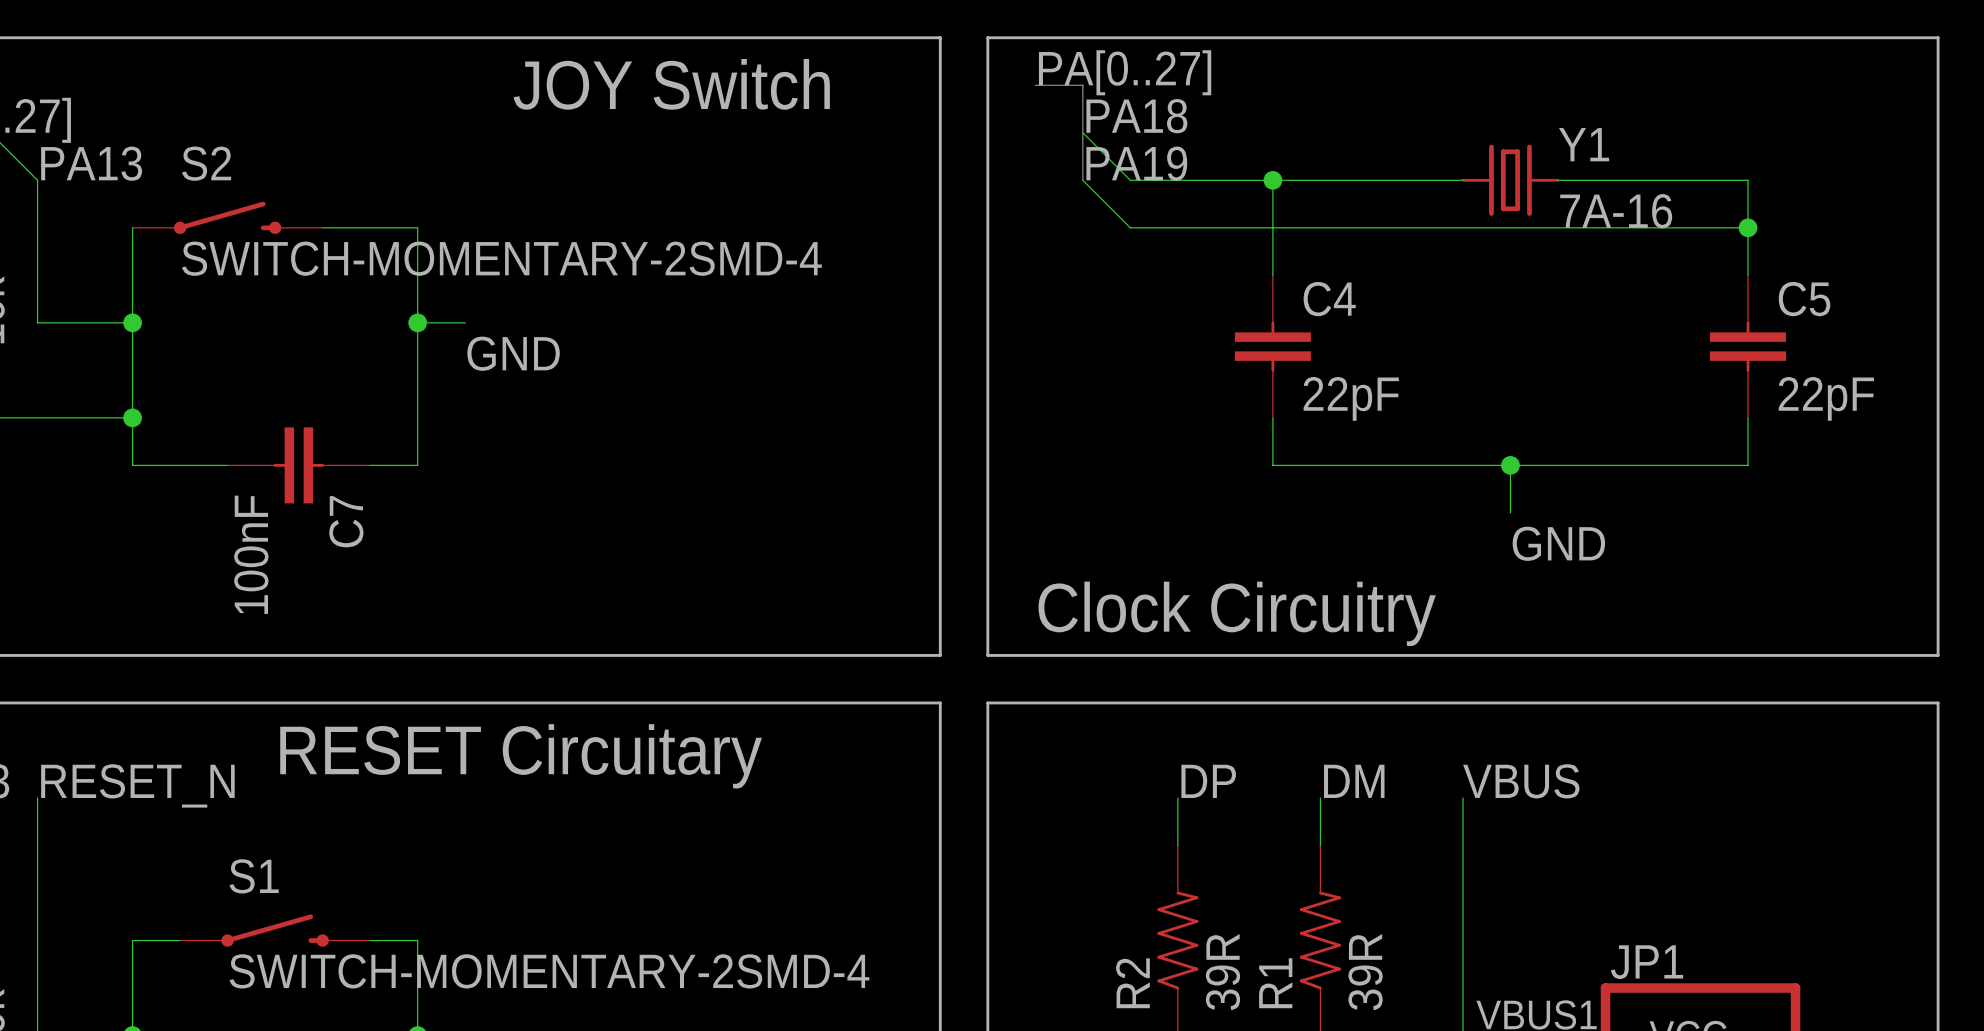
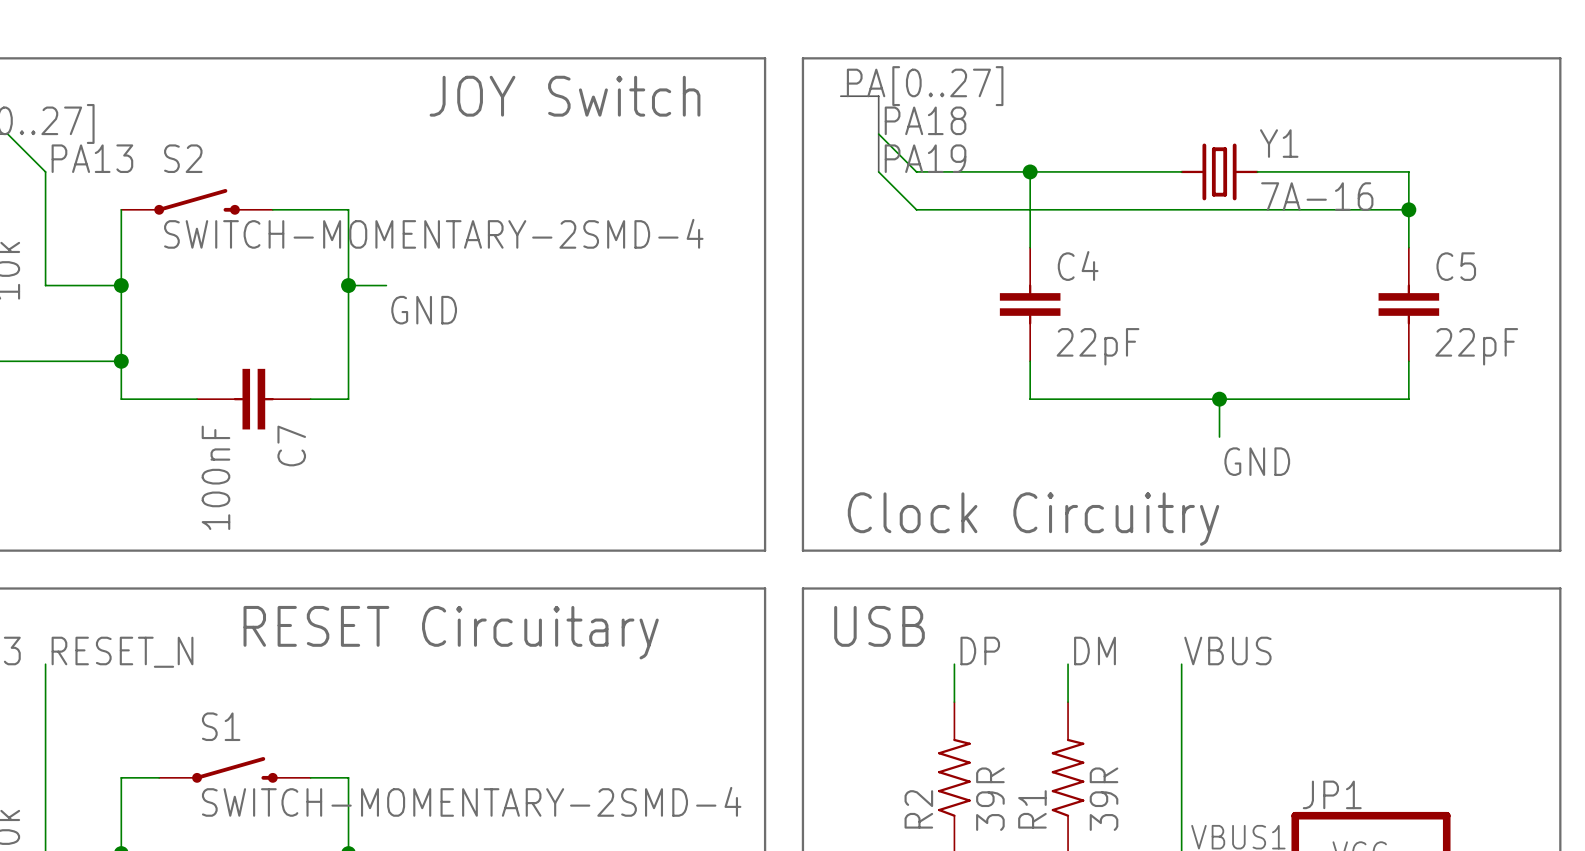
text: none -> USB (879, 626)

